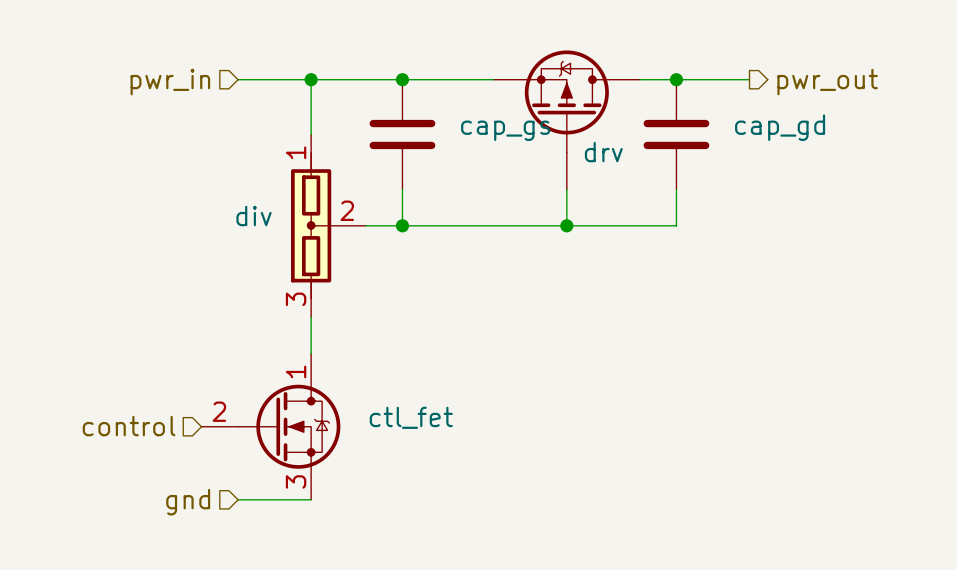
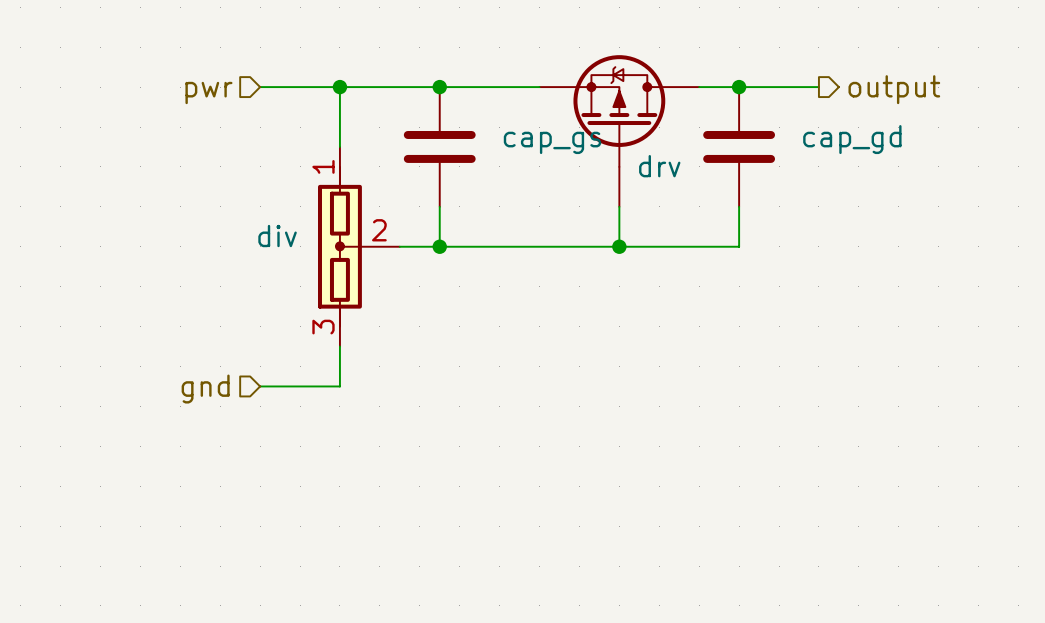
hierarchical label: pwr_in (170, 82) -> pwr (208, 92)
hierarchical label: pwr_out (827, 82) -> output (894, 89)
hierarchical label: control (129, 426) -> none
ctl_fet: (270, 426) -> none
wire: (238, 499) (311, 499) -> (260, 386) (339, 386)
hierarchical label position: gnd (188, 502) -> gnd (205, 389)

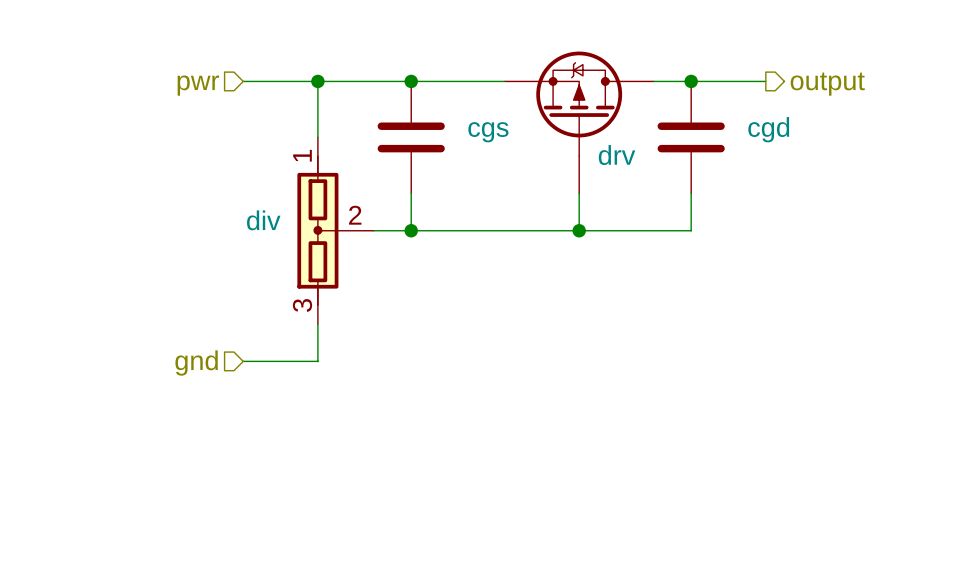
cap_gd name: cap_gd (852, 139) -> cgd (768, 129)
cap_gs name: cap_gs (552, 142) -> cgs (488, 132)

